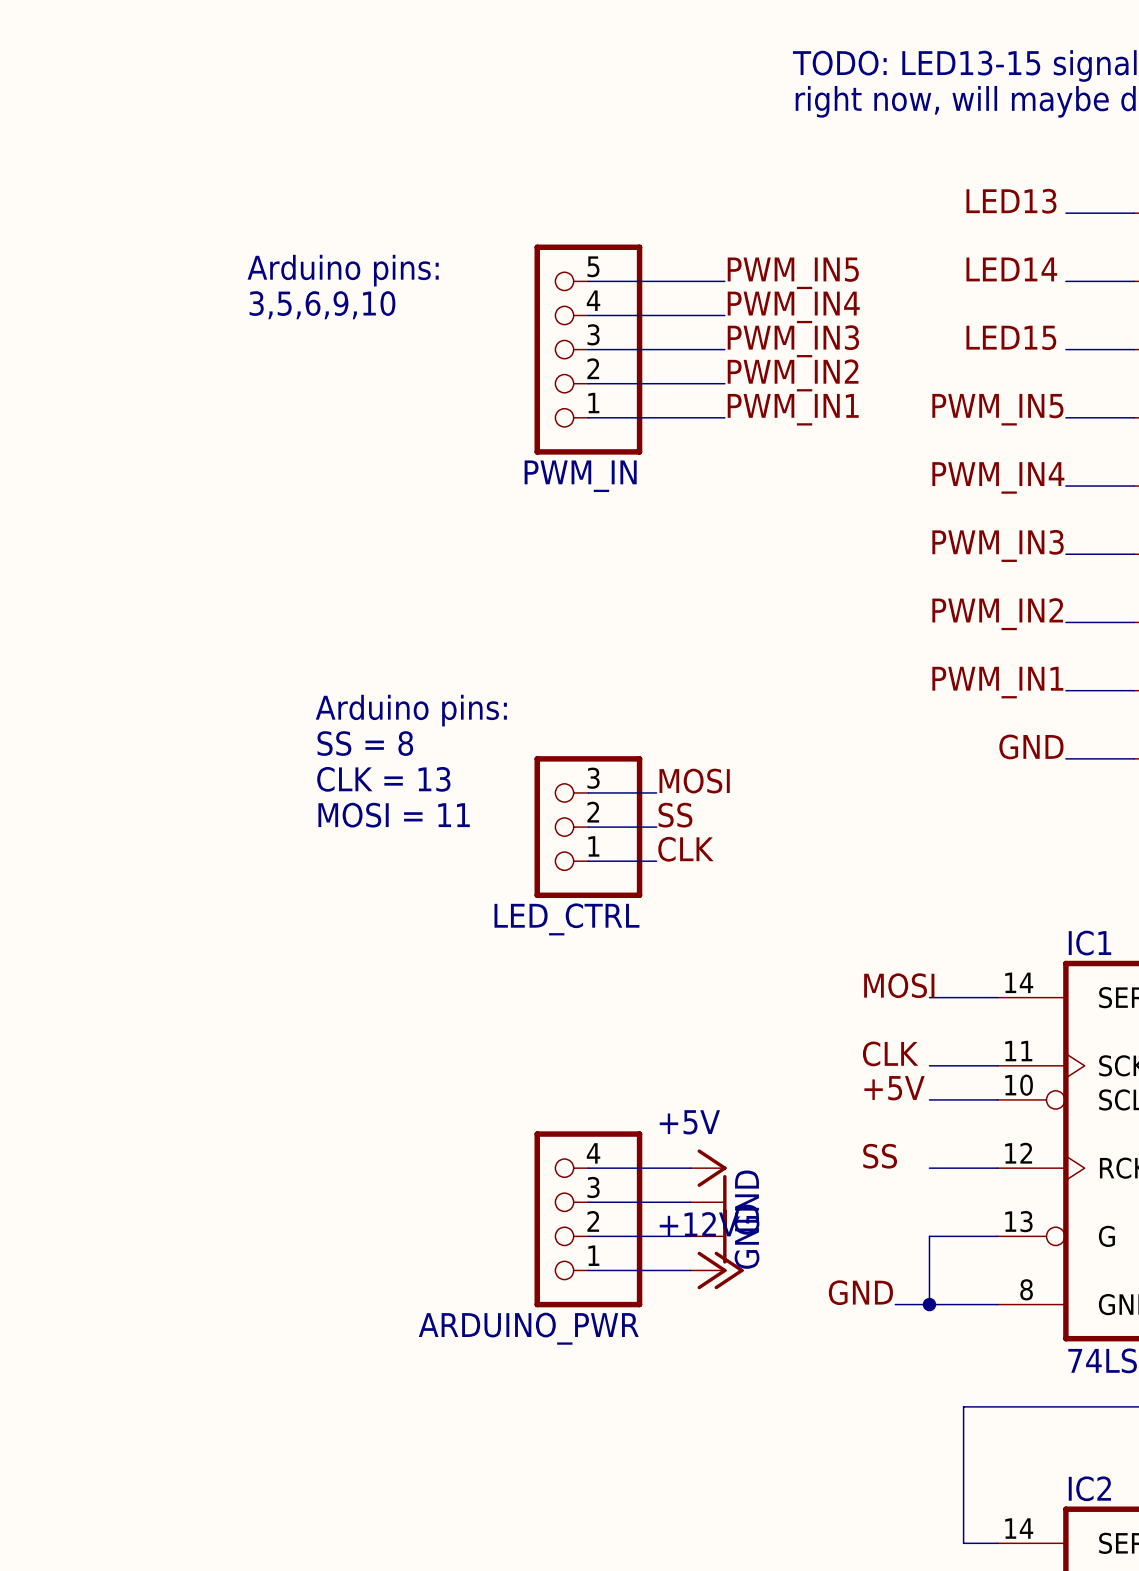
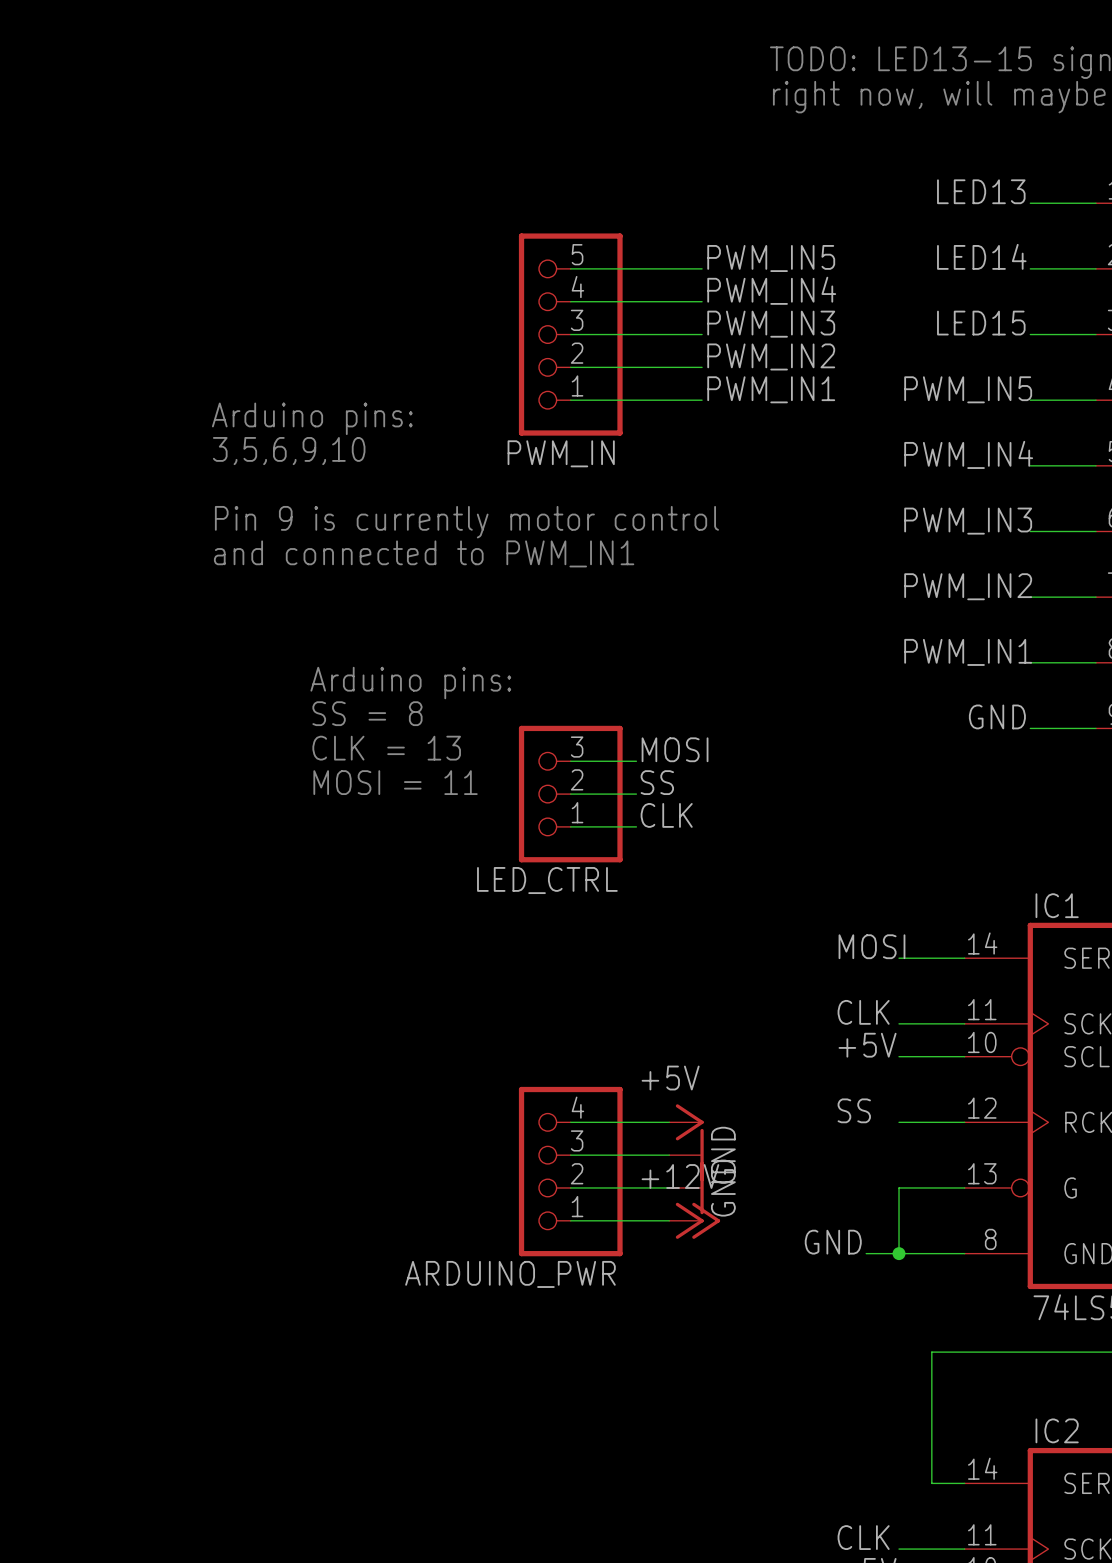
text position: Arduino pins: (343, 270) -> Arduino pins: (312, 418)
text position: 3,5,6,9,10 (322, 305) -> 3,5,6,9,10 (289, 451)
text: none -> Pin 9 is currently motor control (466, 522)
text: none -> and connected to PWM_IN1 (424, 553)

